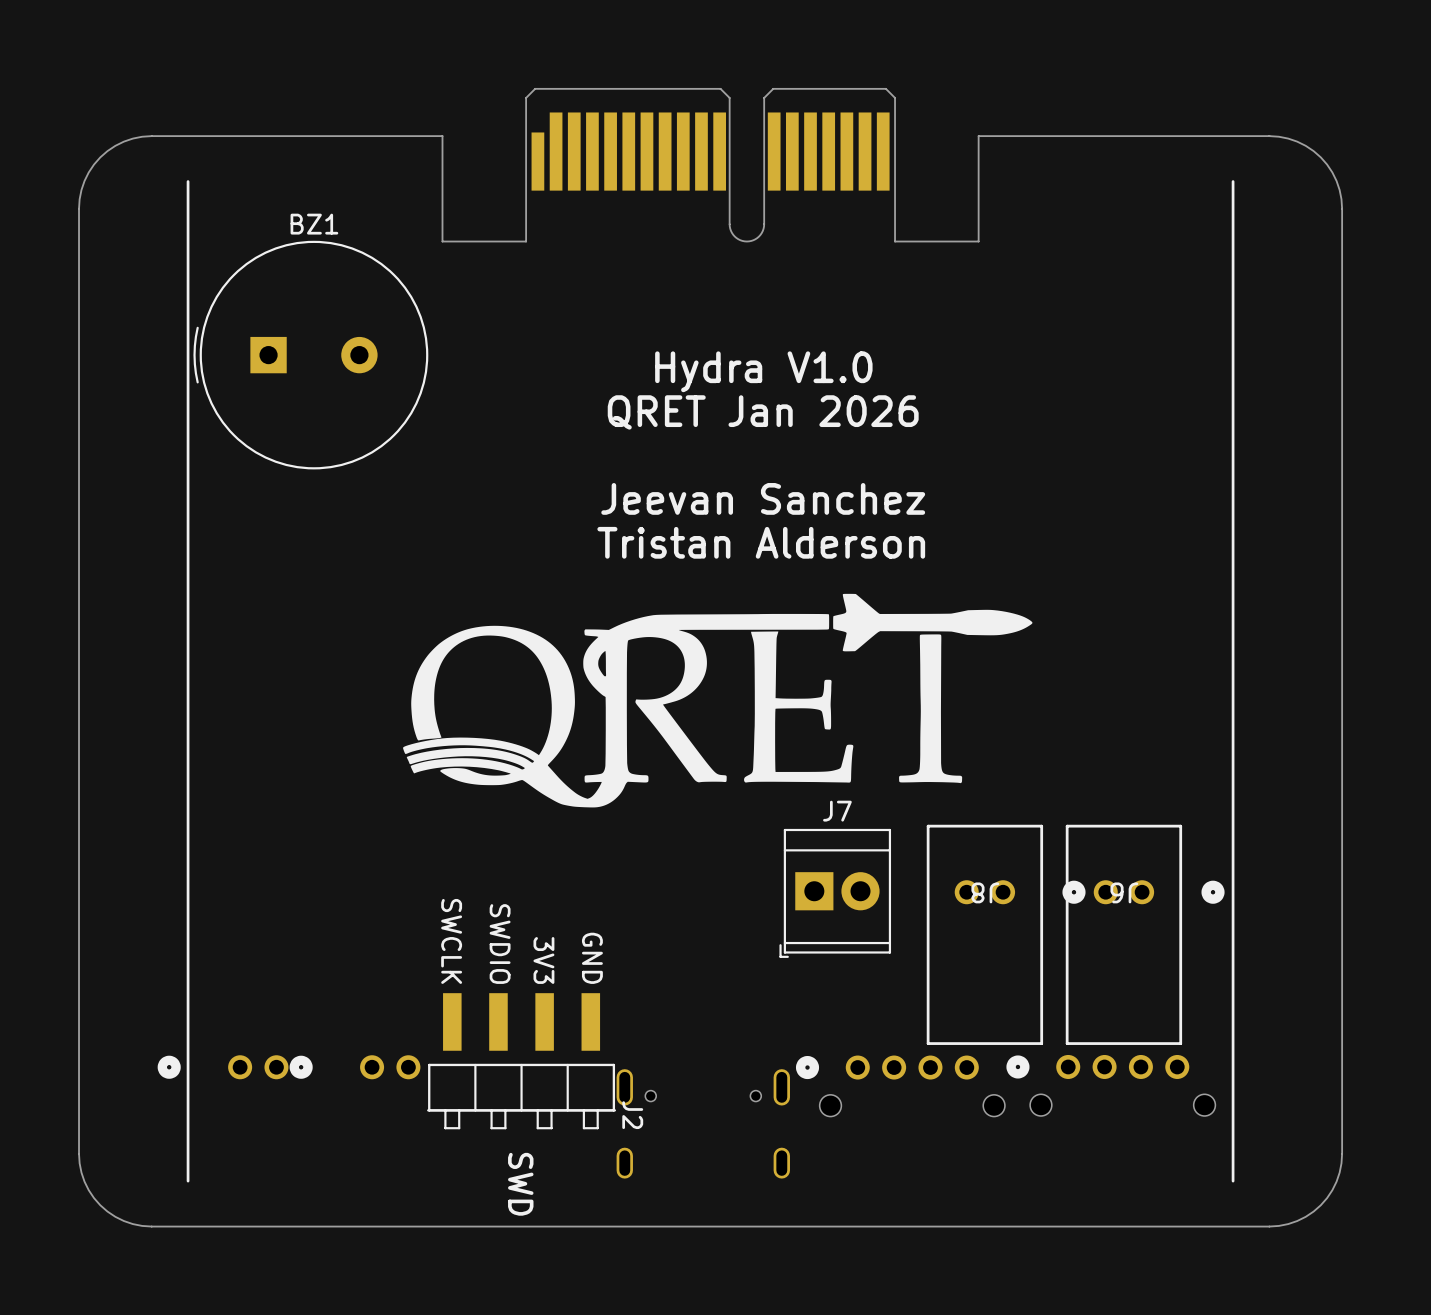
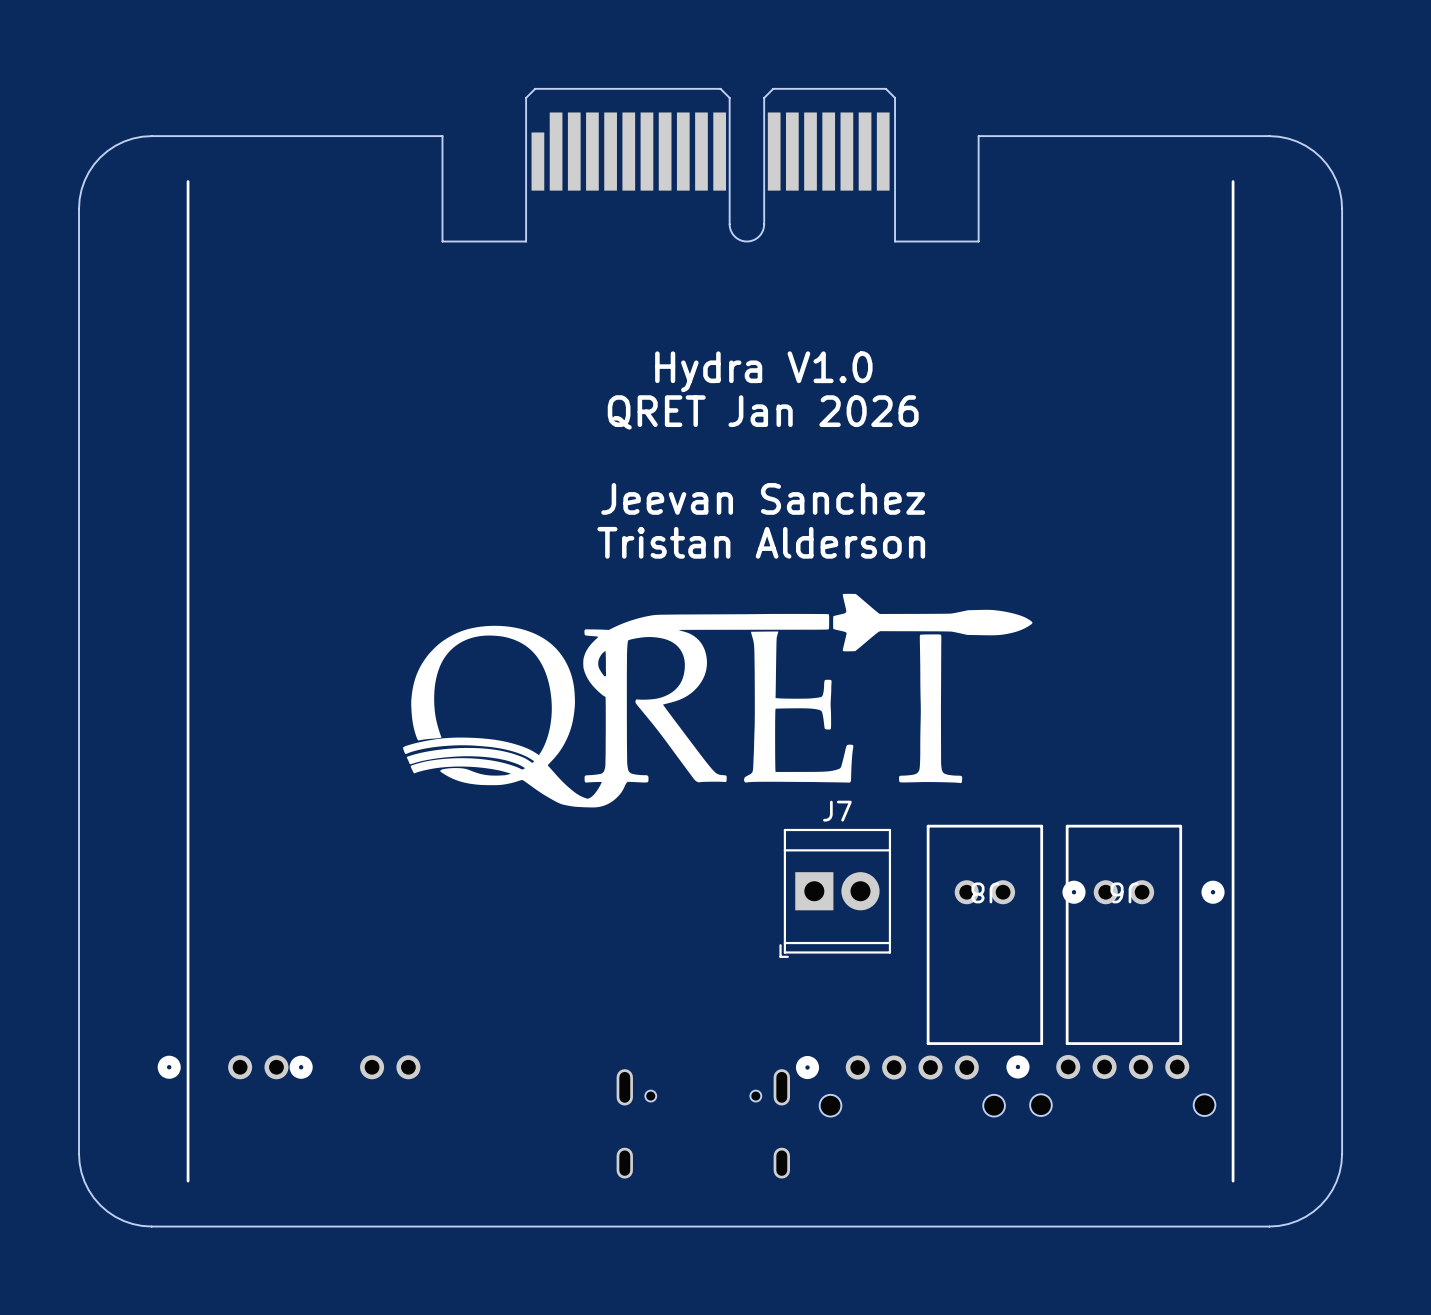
BZ1: (310, 355) -> none
J2: (521, 1061) -> none

